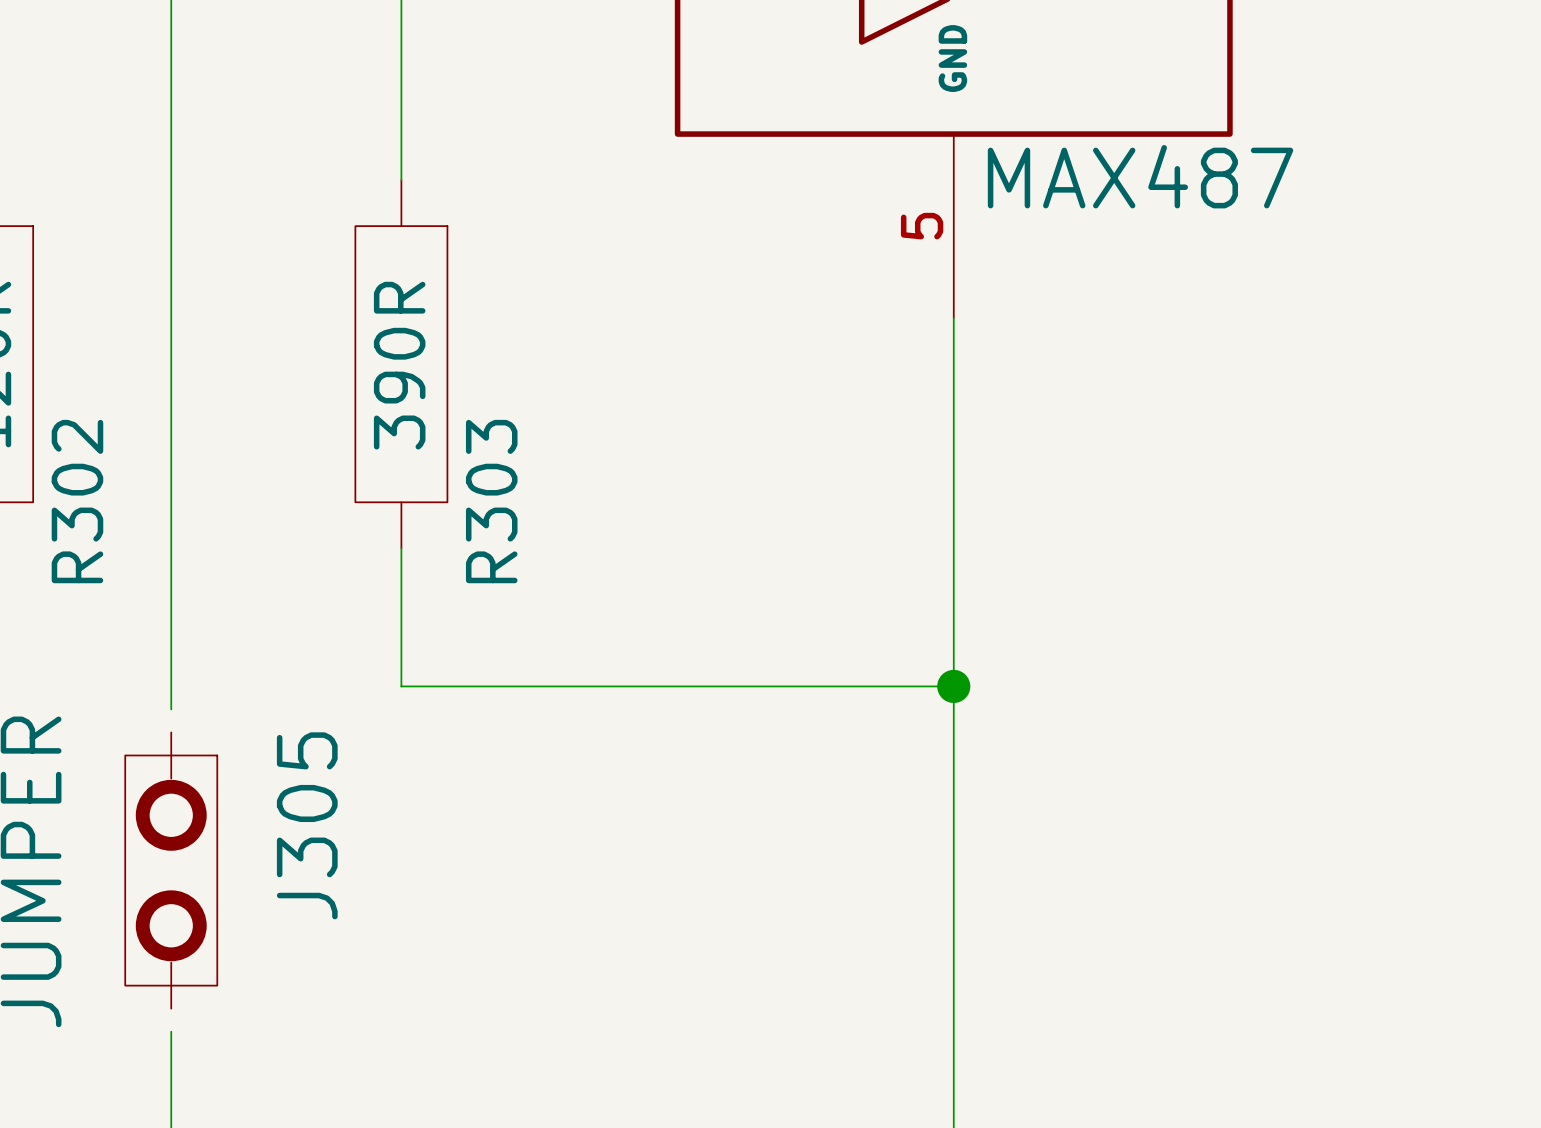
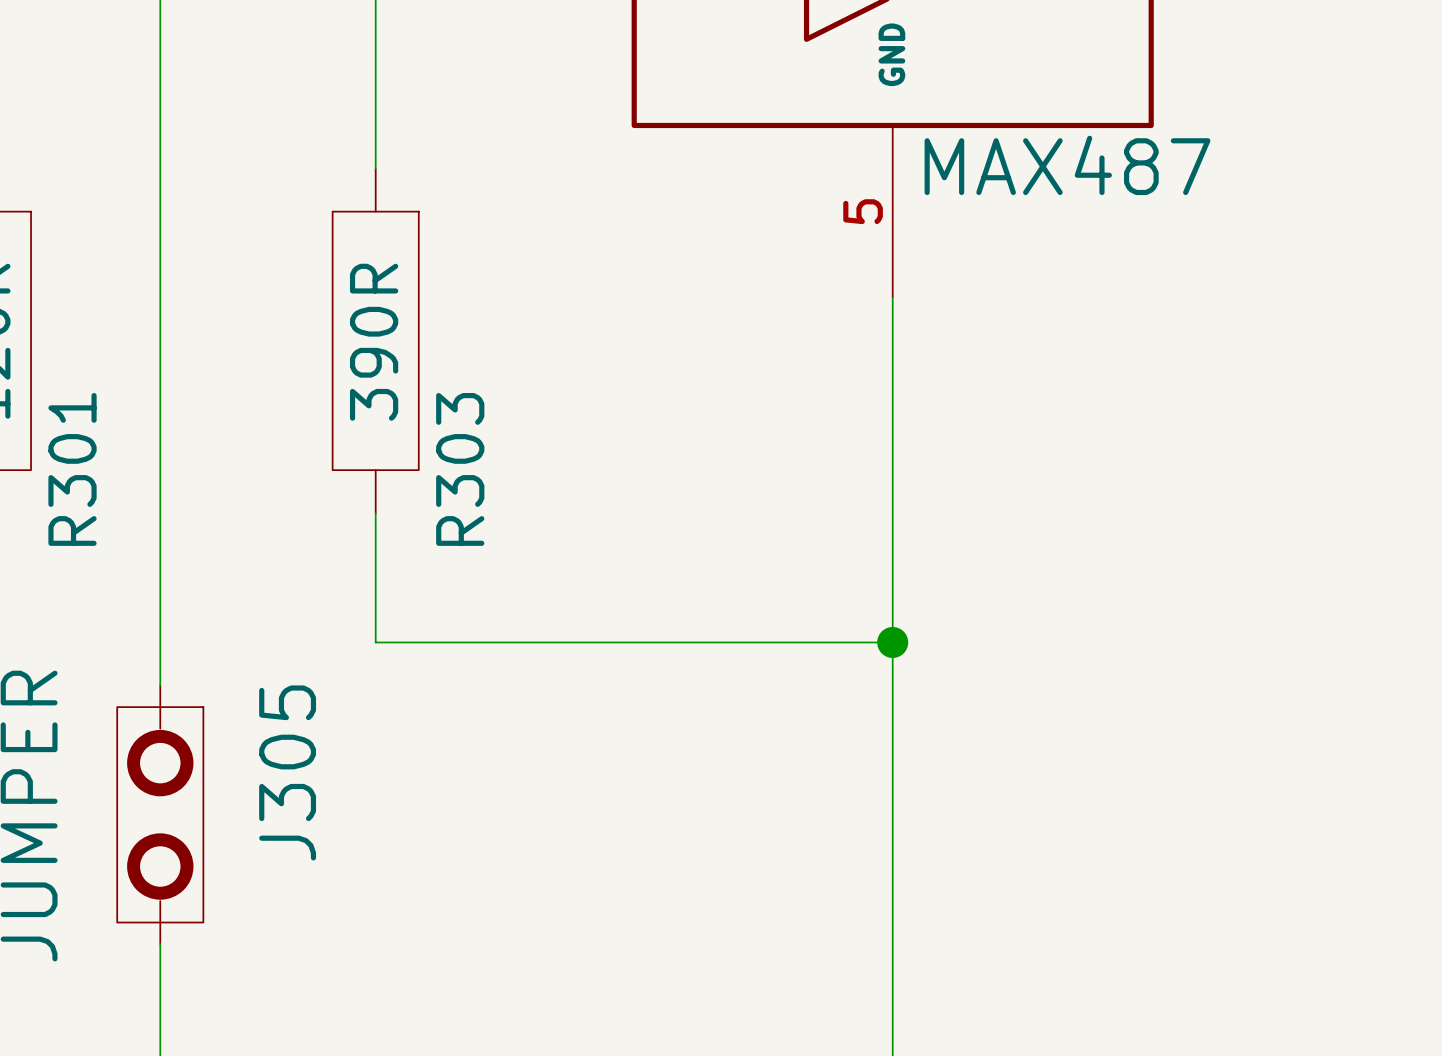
R302 name: R302 (77, 501) -> R301 (72, 469)
wire: none -> (160, 664) (160, 685)
wire: none -> (160, 944) (160, 965)

